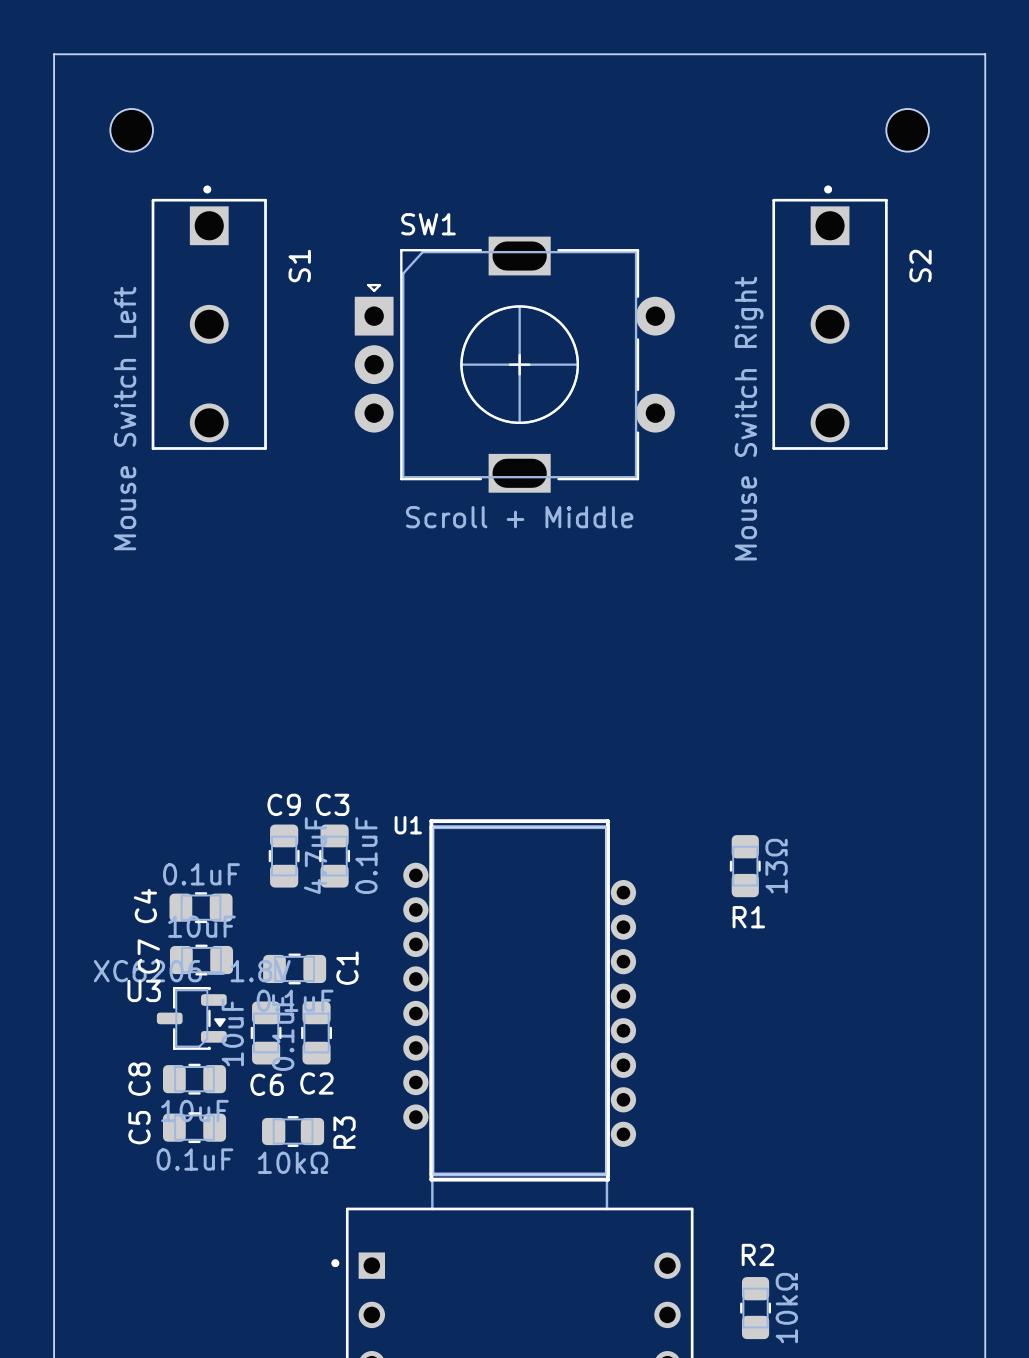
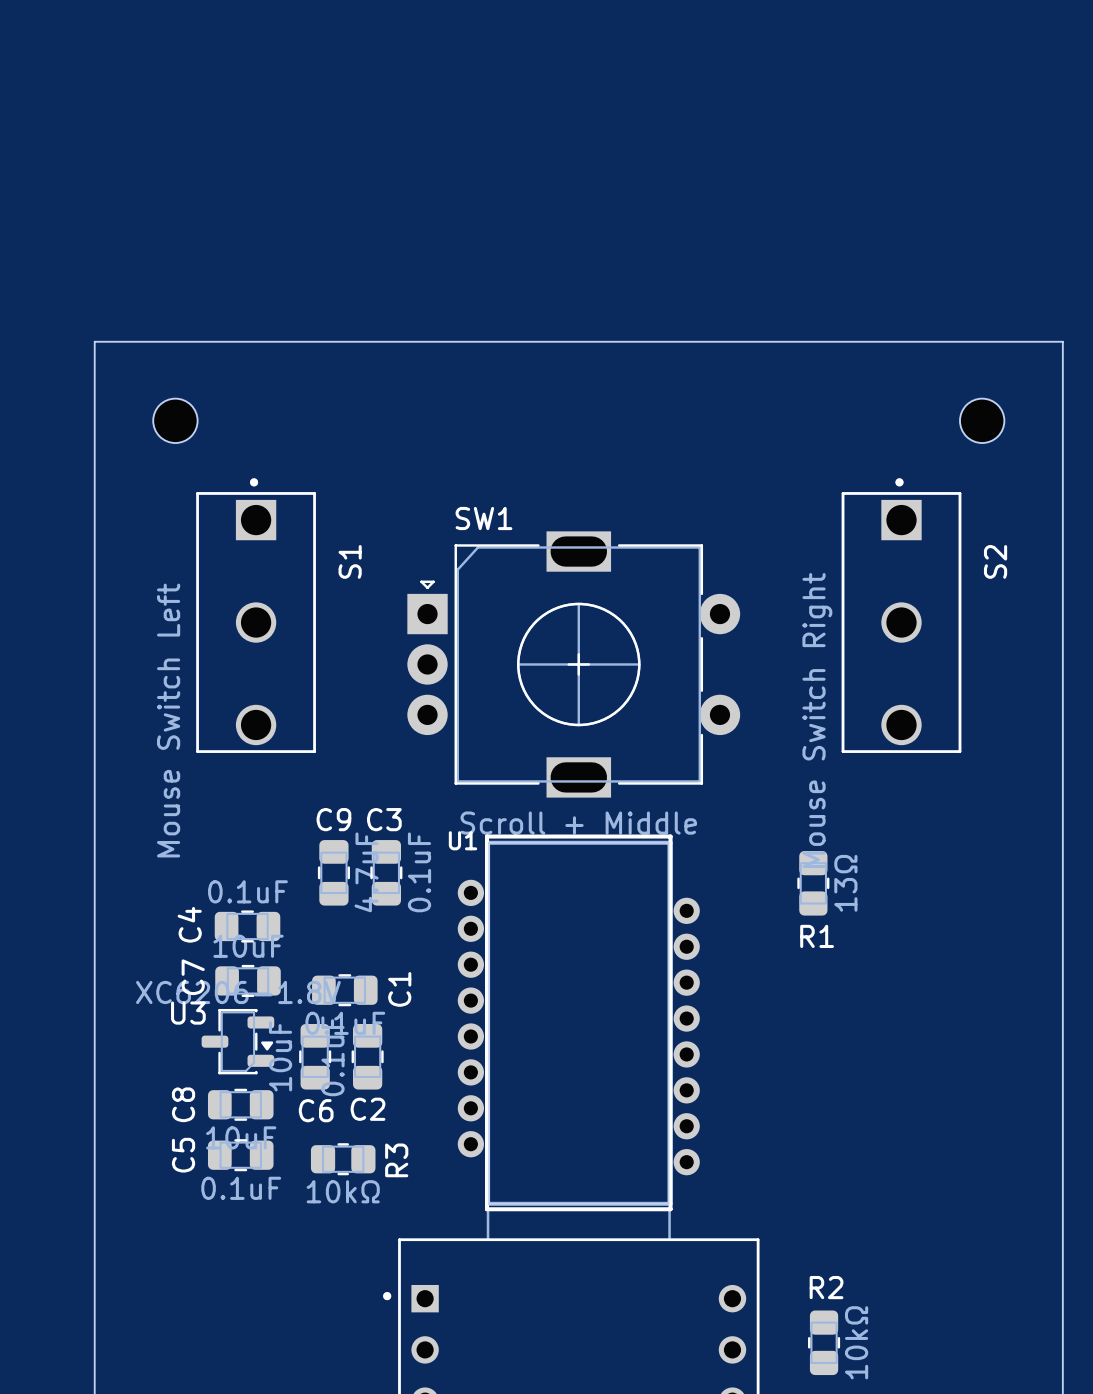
part position: (131, 130) -> (175, 420)
part position: (907, 130) -> (982, 420)
S1 position: (209, 317) -> (256, 615)
S2 position: (830, 317) -> (901, 615)
board edge: (54, 345) (54, 54) (985, 54) (985, 345) -> (94, 341) (1062, 341)
SW1 position: (514, 364) -> (573, 664)

